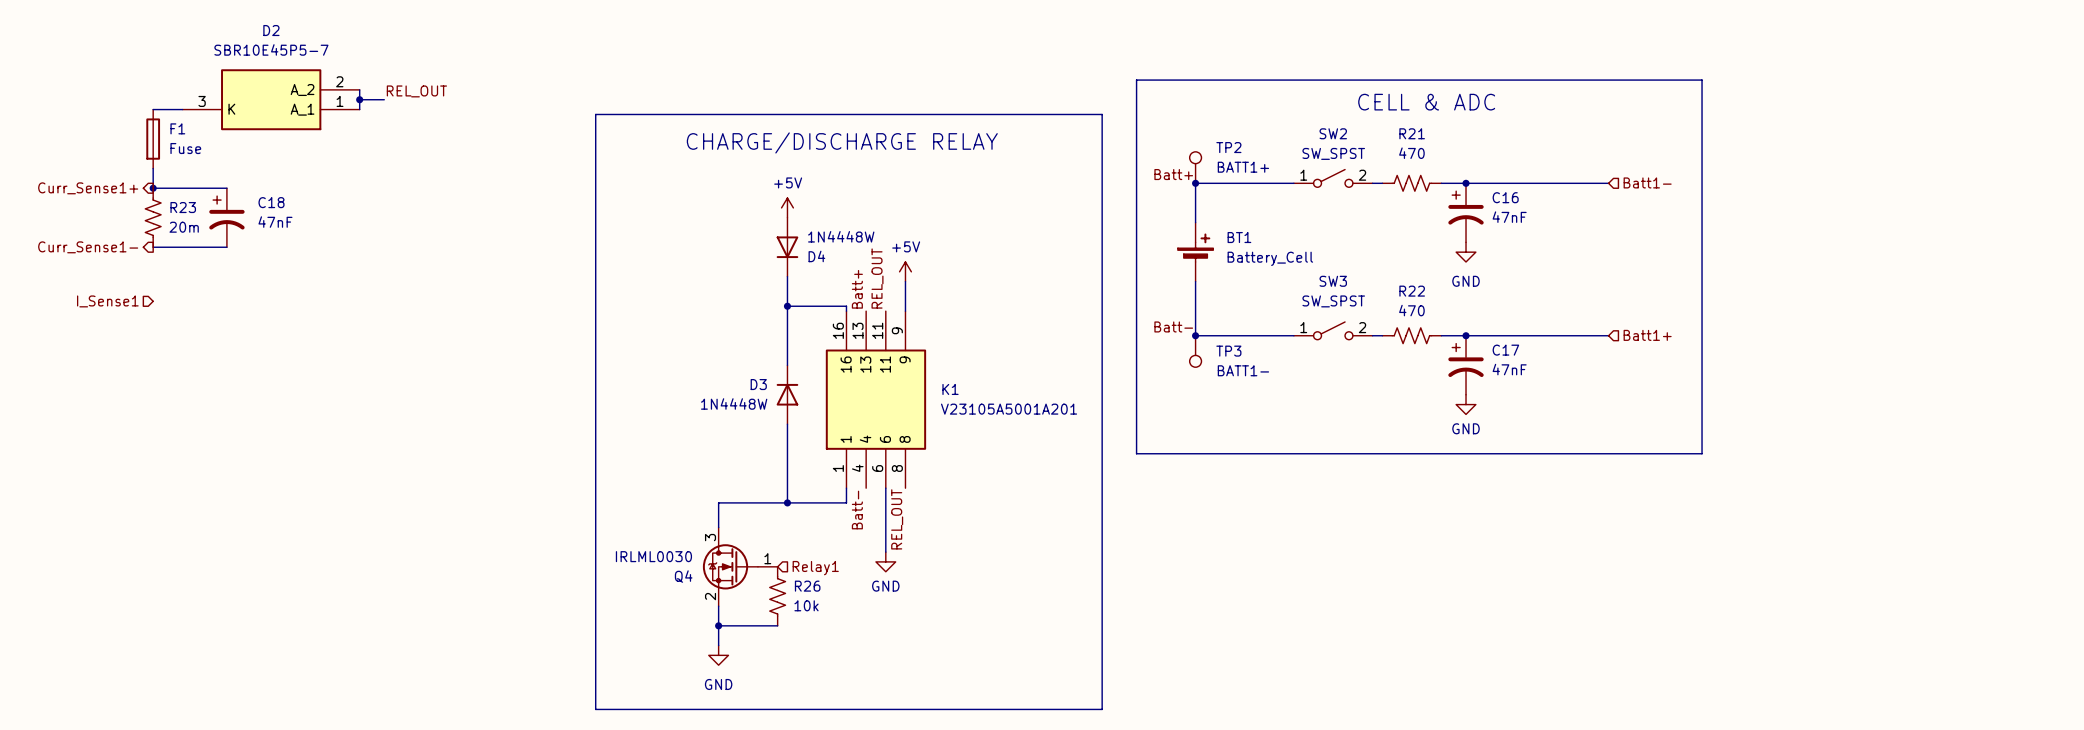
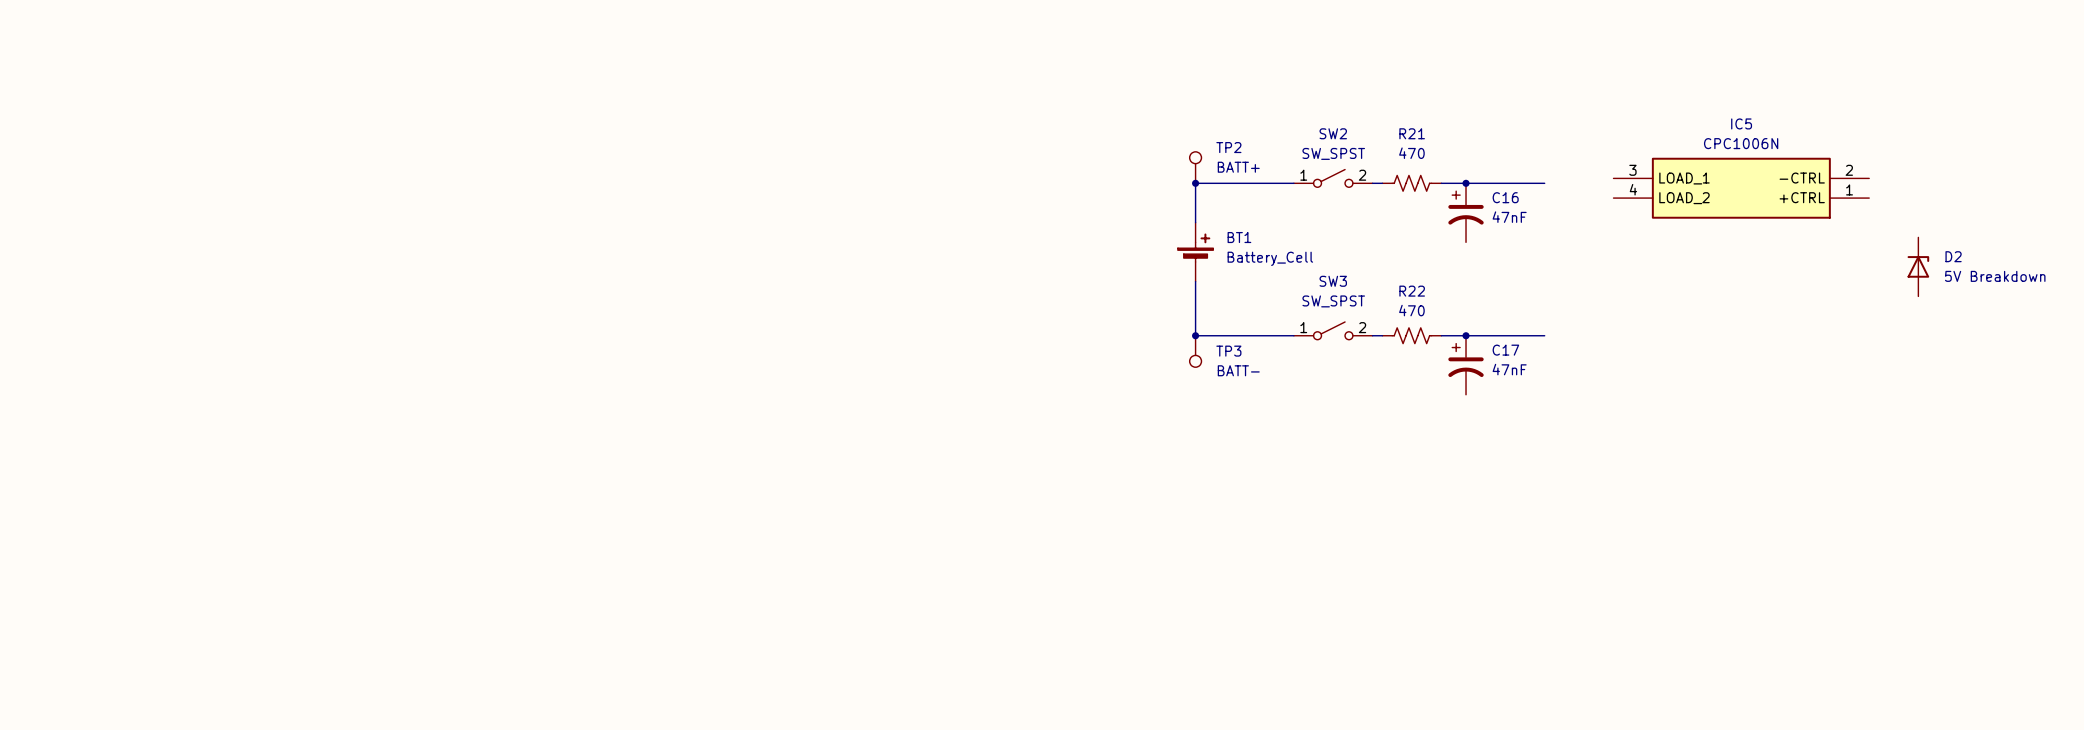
D2 name position: D2 (271, 30) -> D2 (1953, 256)
D2 value: SBR10E45P5-7 (271, 49) -> 5V Breakdown (1995, 276)
D2 symbol: [182, 69, 360, 131] -> [1907, 237, 1930, 297]
line: (1136, 80) (1702, 80) (1702, 453) (1136, 453) (1136, 80) -> none
wire: (359, 89) (359, 109) -> none
label: REL_OUT (416, 91) -> none
wire: (359, 99) (384, 99) -> none
junction: (359, 99) -> none
text: CELL & ADC (1426, 102) -> none
wire: (153, 109) (182, 109) -> none
line: (595, 114) (1102, 114) (1102, 709) (595, 709) (595, 114) -> none
F1: Fuse (153, 139) -> none
text: CHARGE/DISCHARGE RELAY (842, 142) -> none
TP2 value: BATT1+ (1243, 167) -> BATT+ (1238, 167)
wire: (153, 168) (153, 188) (226, 188) -> none
label: Batt+ (1173, 174) -> none
hierarchical label: Batt1- (1647, 182) -> none
wire: (1544, 183) (1608, 183) -> none
hierarchical label: Curr_Sense1+ (88, 188) -> none
junction: (153, 188) -> none
IC5: none -> CPC1006N (1741, 188)
power symbol: +5V (787, 207) -> none
R23: 20m (153, 217) -> none
C18: 47nF (226, 217) -> none
hierarchical label: Curr_Sense1- (88, 247) -> none
wire: (153, 247) (226, 247) -> none
D4: 1N4448W (787, 247) -> none
power symbol: GND (1466, 252) -> none
power symbol: +5V (905, 271) -> none
wire: (787, 276) (787, 365) -> none
label: REL_OUT (877, 278) -> none
wire: (905, 281) (905, 311) -> none
label: Batt+ (857, 289) -> none
hierarchical label: I_Sense1 (107, 301) -> none
wire: (787, 306) (846, 306) (846, 311) -> none
junction: (787, 306) -> none
label: Batt- (1173, 326) -> none
wire: (1544, 335) (1608, 335) -> none
hierarchical label: Batt1+ (1647, 335) -> none
TP3 value: BATT1- (1243, 370) -> BATT- (1238, 370)
D3: 1N4448W (787, 394) -> none
K1: V23105A5001A201 (875, 399) -> none
power symbol: GND (1466, 404) -> none
wire: (787, 424) (787, 502) -> none
wire: (846, 488) (846, 502) (718, 502) (718, 527) -> none
wire: (885, 488) (885, 552) -> none
junction: (787, 502) -> none
label: Batt- (857, 510) -> none
label: REL_OUT (897, 519) -> none
power symbol: GND (885, 561) -> none
Q4: IRLML0030 (740, 566) -> none
hierarchical label: Relay1 (815, 568) -> none
R26: 10k (777, 596) -> none
wire: (718, 606) (718, 645) -> none
wire: (718, 625) (777, 625) -> none
junction: (718, 625) -> none
power symbol: GND (718, 655) -> none

